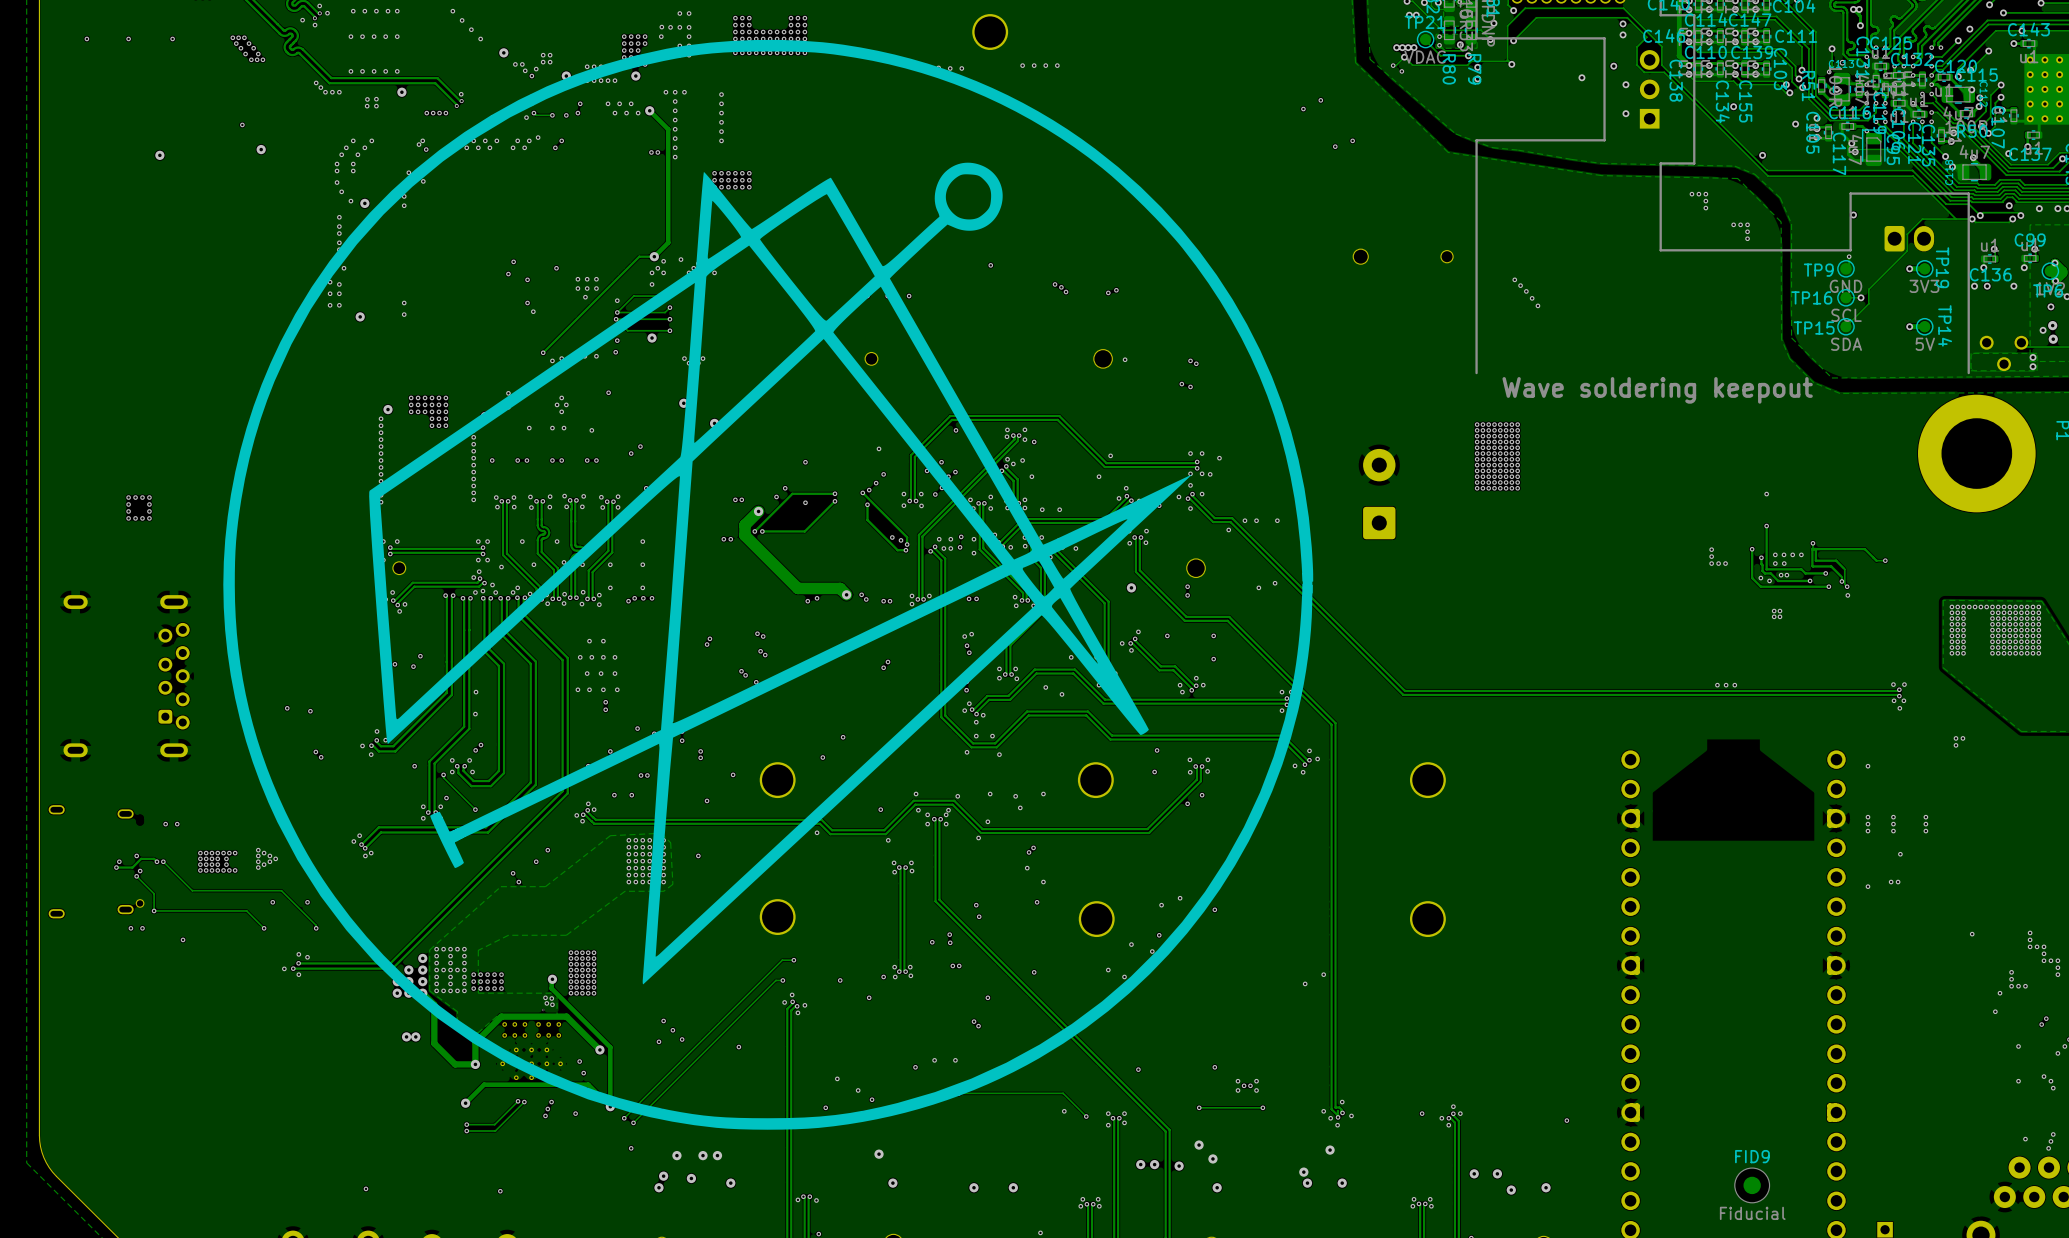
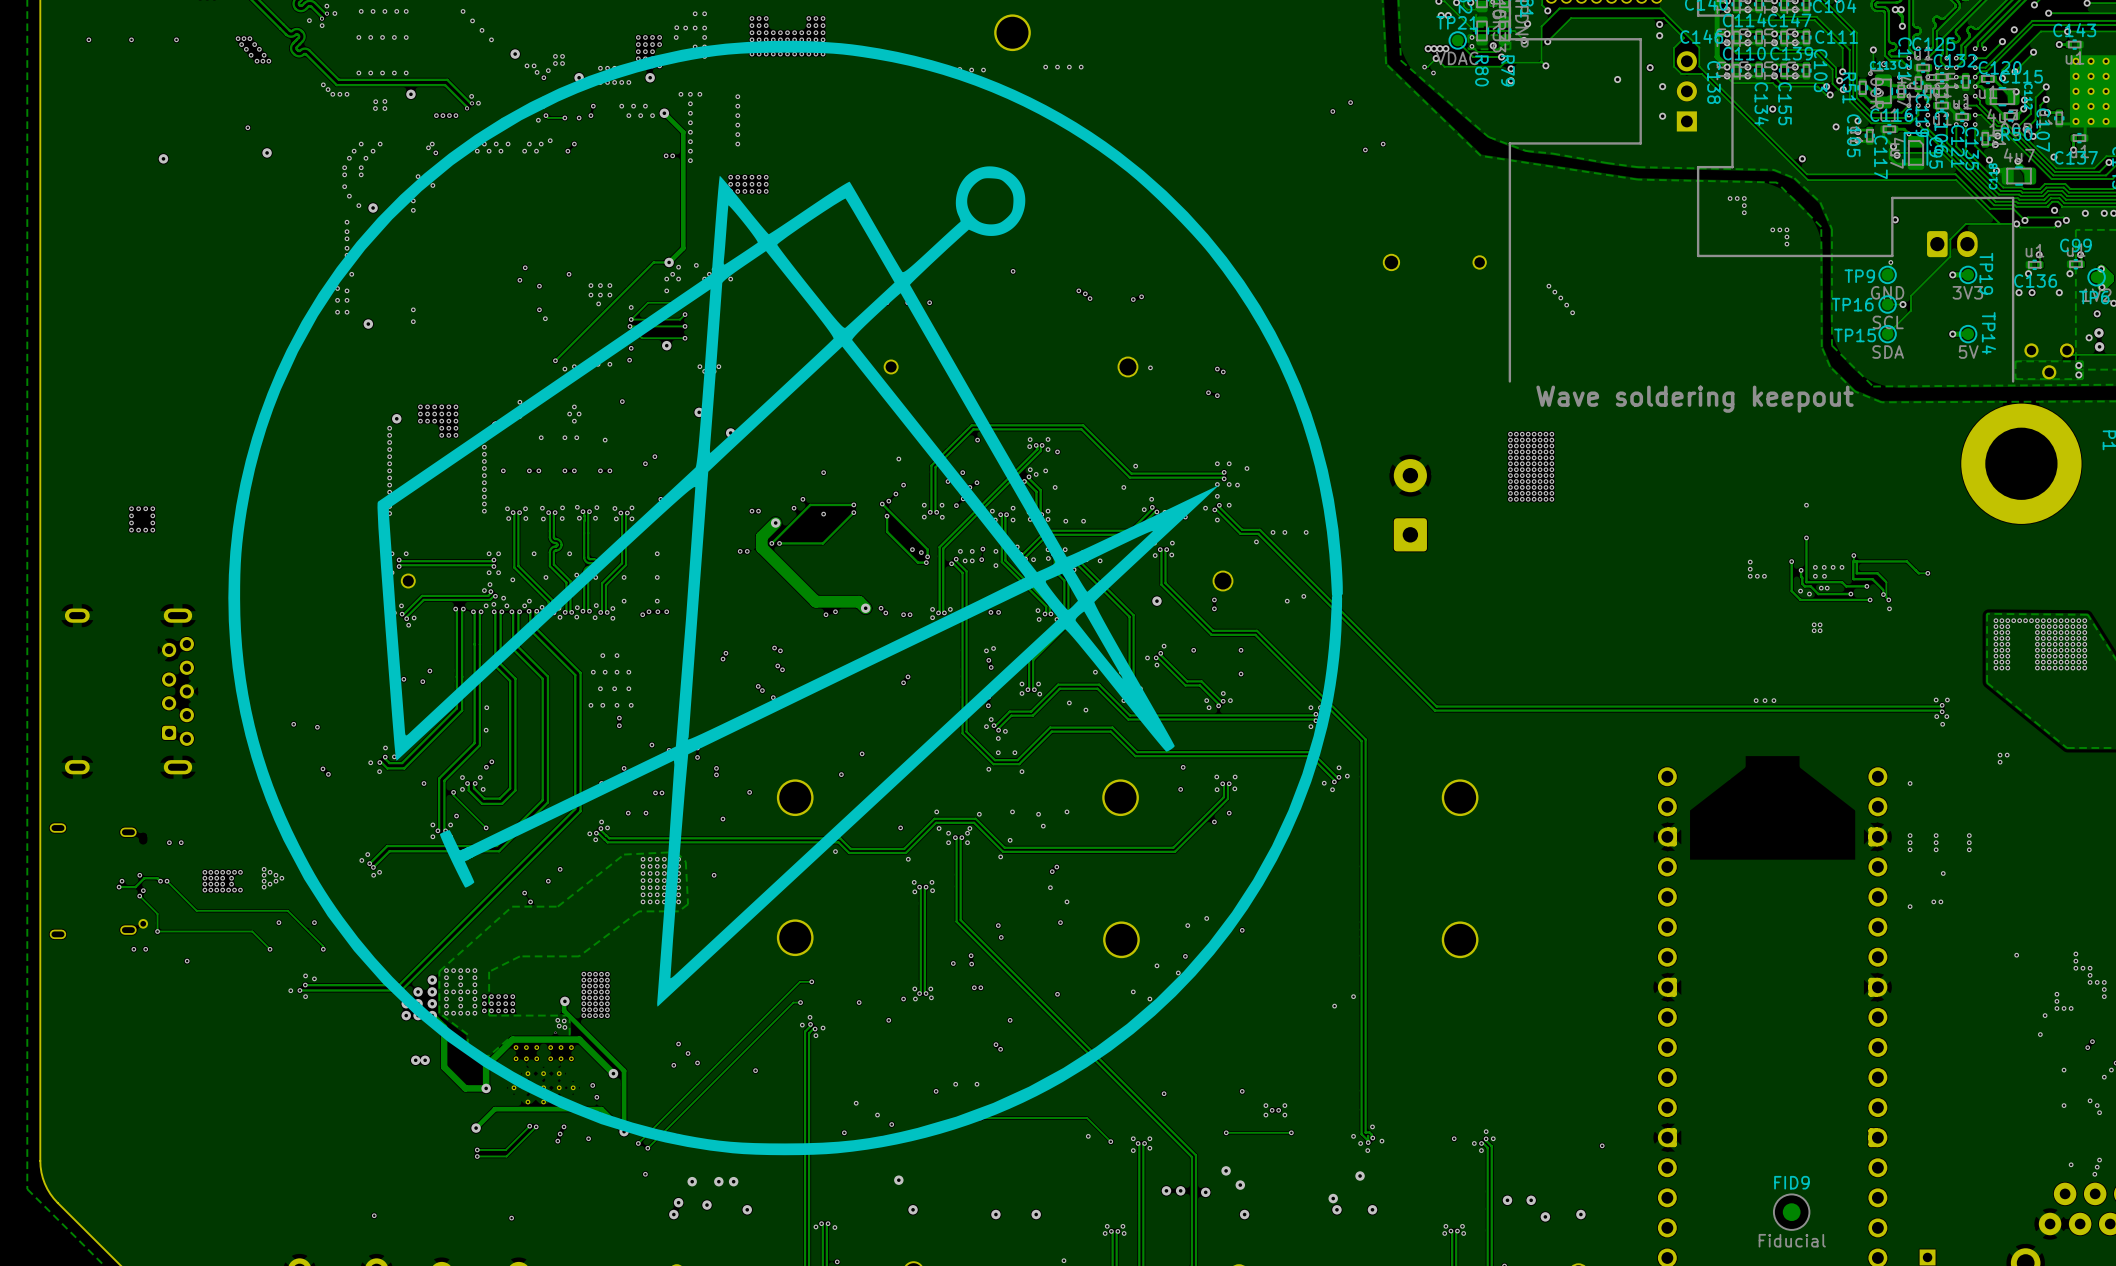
via: none -> (478, 103)

